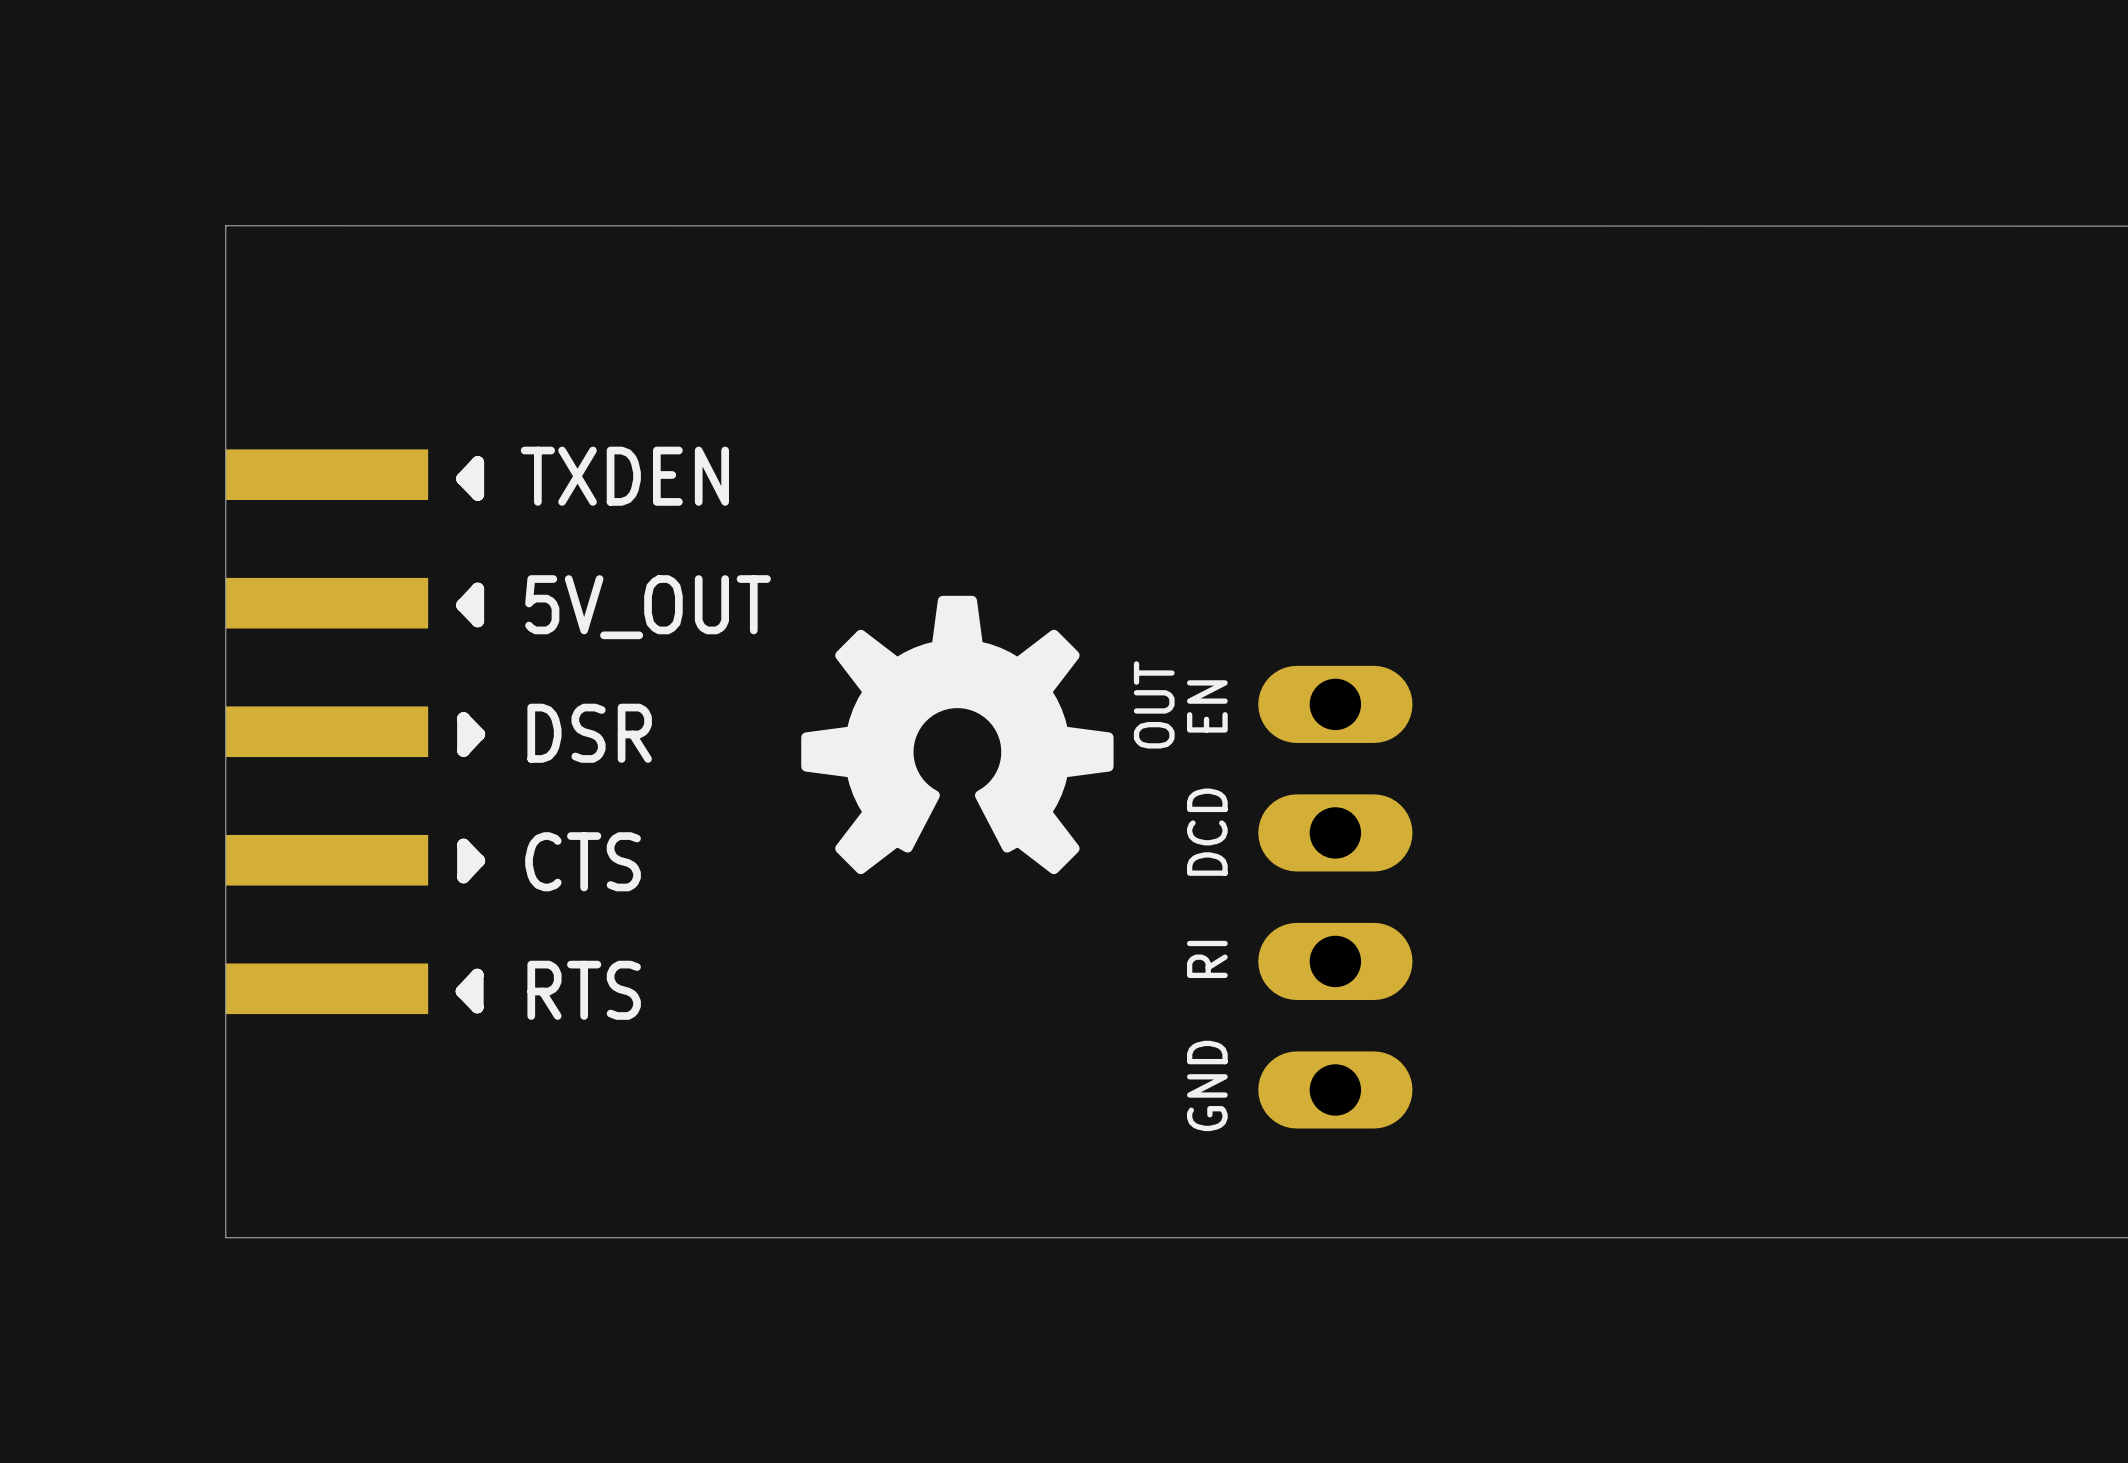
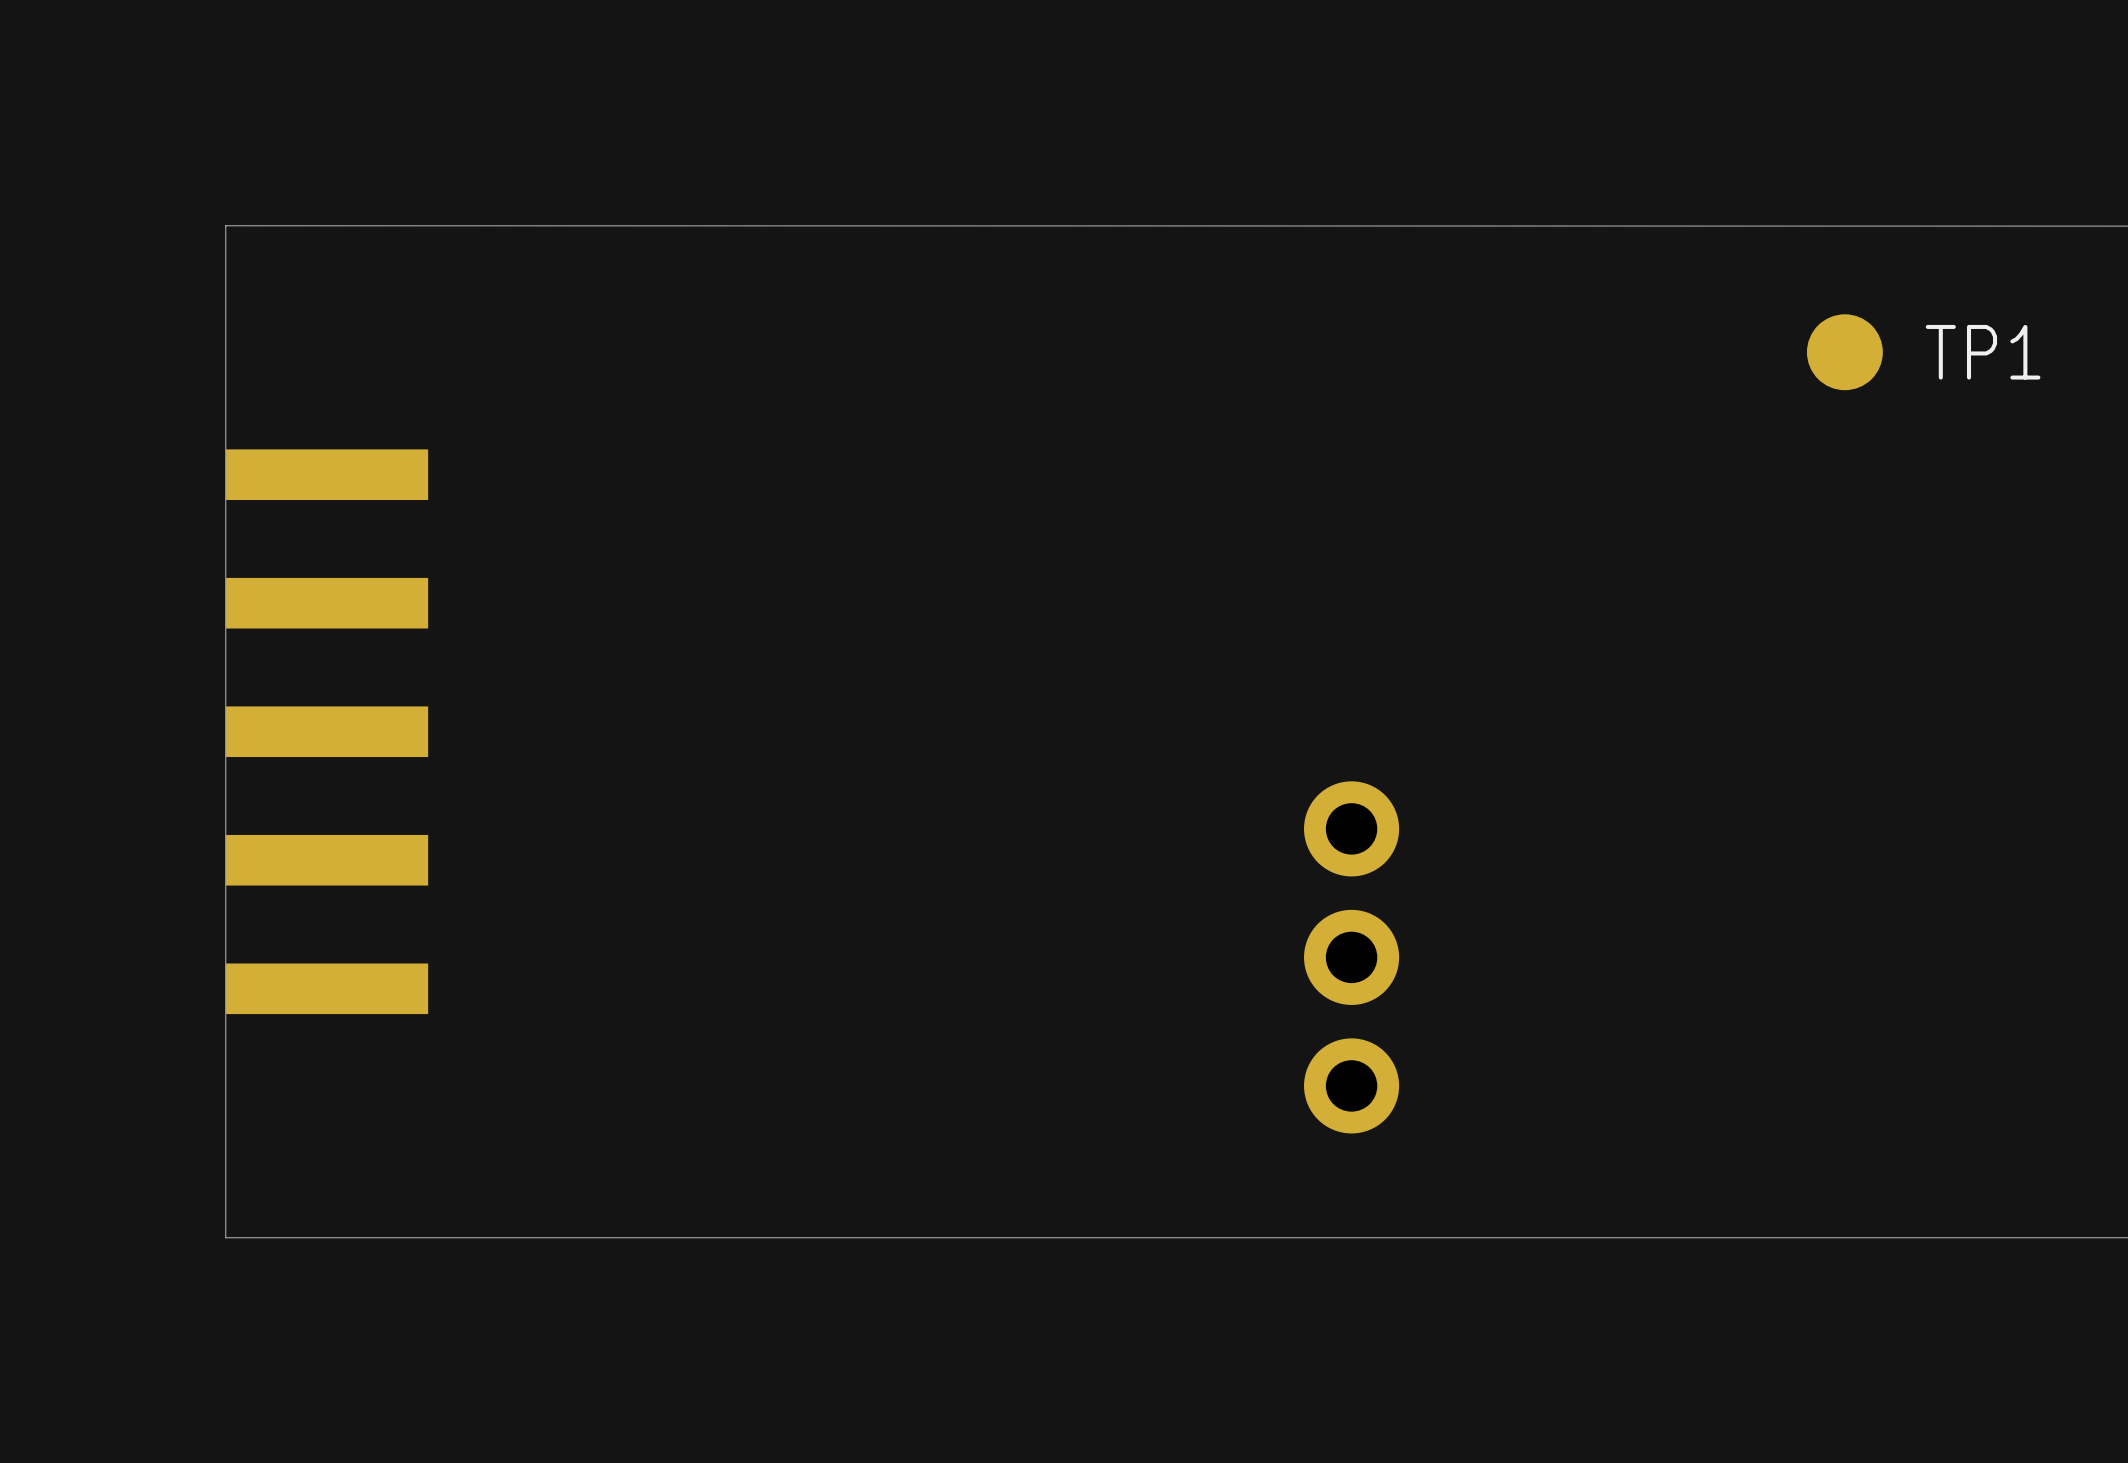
TP1: none -> (1844, 352)
line: (477, 462) (477, 494) (462, 478) (477, 462) -> none
text: TXDEN (624, 476) -> none
line: (477, 589) (462, 605) (477, 620) (477, 589) -> none
drawing: [801, 595, 1114, 875] -> none
text: 5V_OUT (648, 607) -> none
text: OUT (1154, 704) -> none
text: EN (1207, 706) -> none
line: (463, 718) (478, 734) (463, 750) (463, 718) -> none
text: DSR (589, 733) -> none
text: DCD (1207, 832) -> none
line: (463, 845) (463, 876) (478, 860) (463, 845) -> none
text: CTS (583, 861) -> none
part: (1335, 897) -> none
part: none -> (1351, 957)
text: RI (1207, 959) -> none
line: (477, 975) (462, 991) (477, 1006) (477, 975) -> none
text: RTS (584, 990) -> none
text: GND (1207, 1085) -> none

